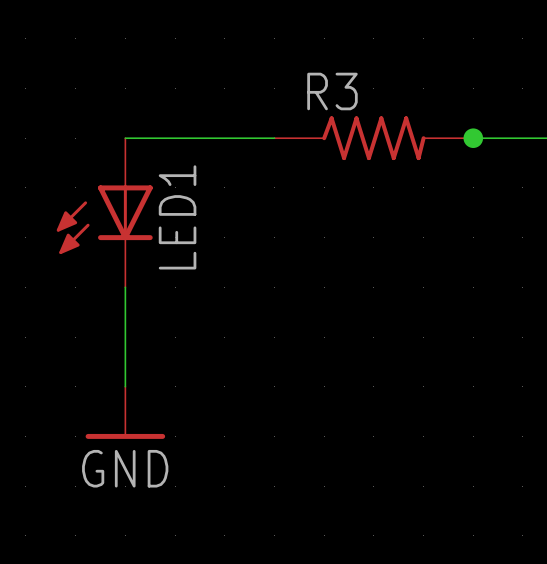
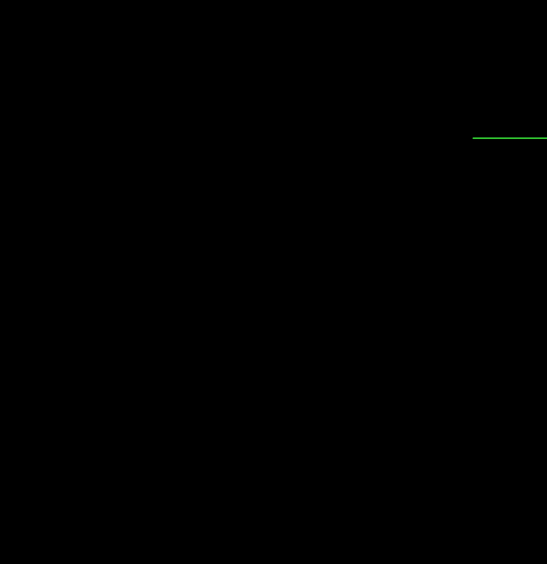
wire: (125, 138) (274, 138) -> none
R3: (373, 138) -> none
junction: (473, 138) -> none
LED1: (104, 212) -> none
wire: (125, 287) (125, 386) -> none
power symbol: GND (125, 412) -> none

